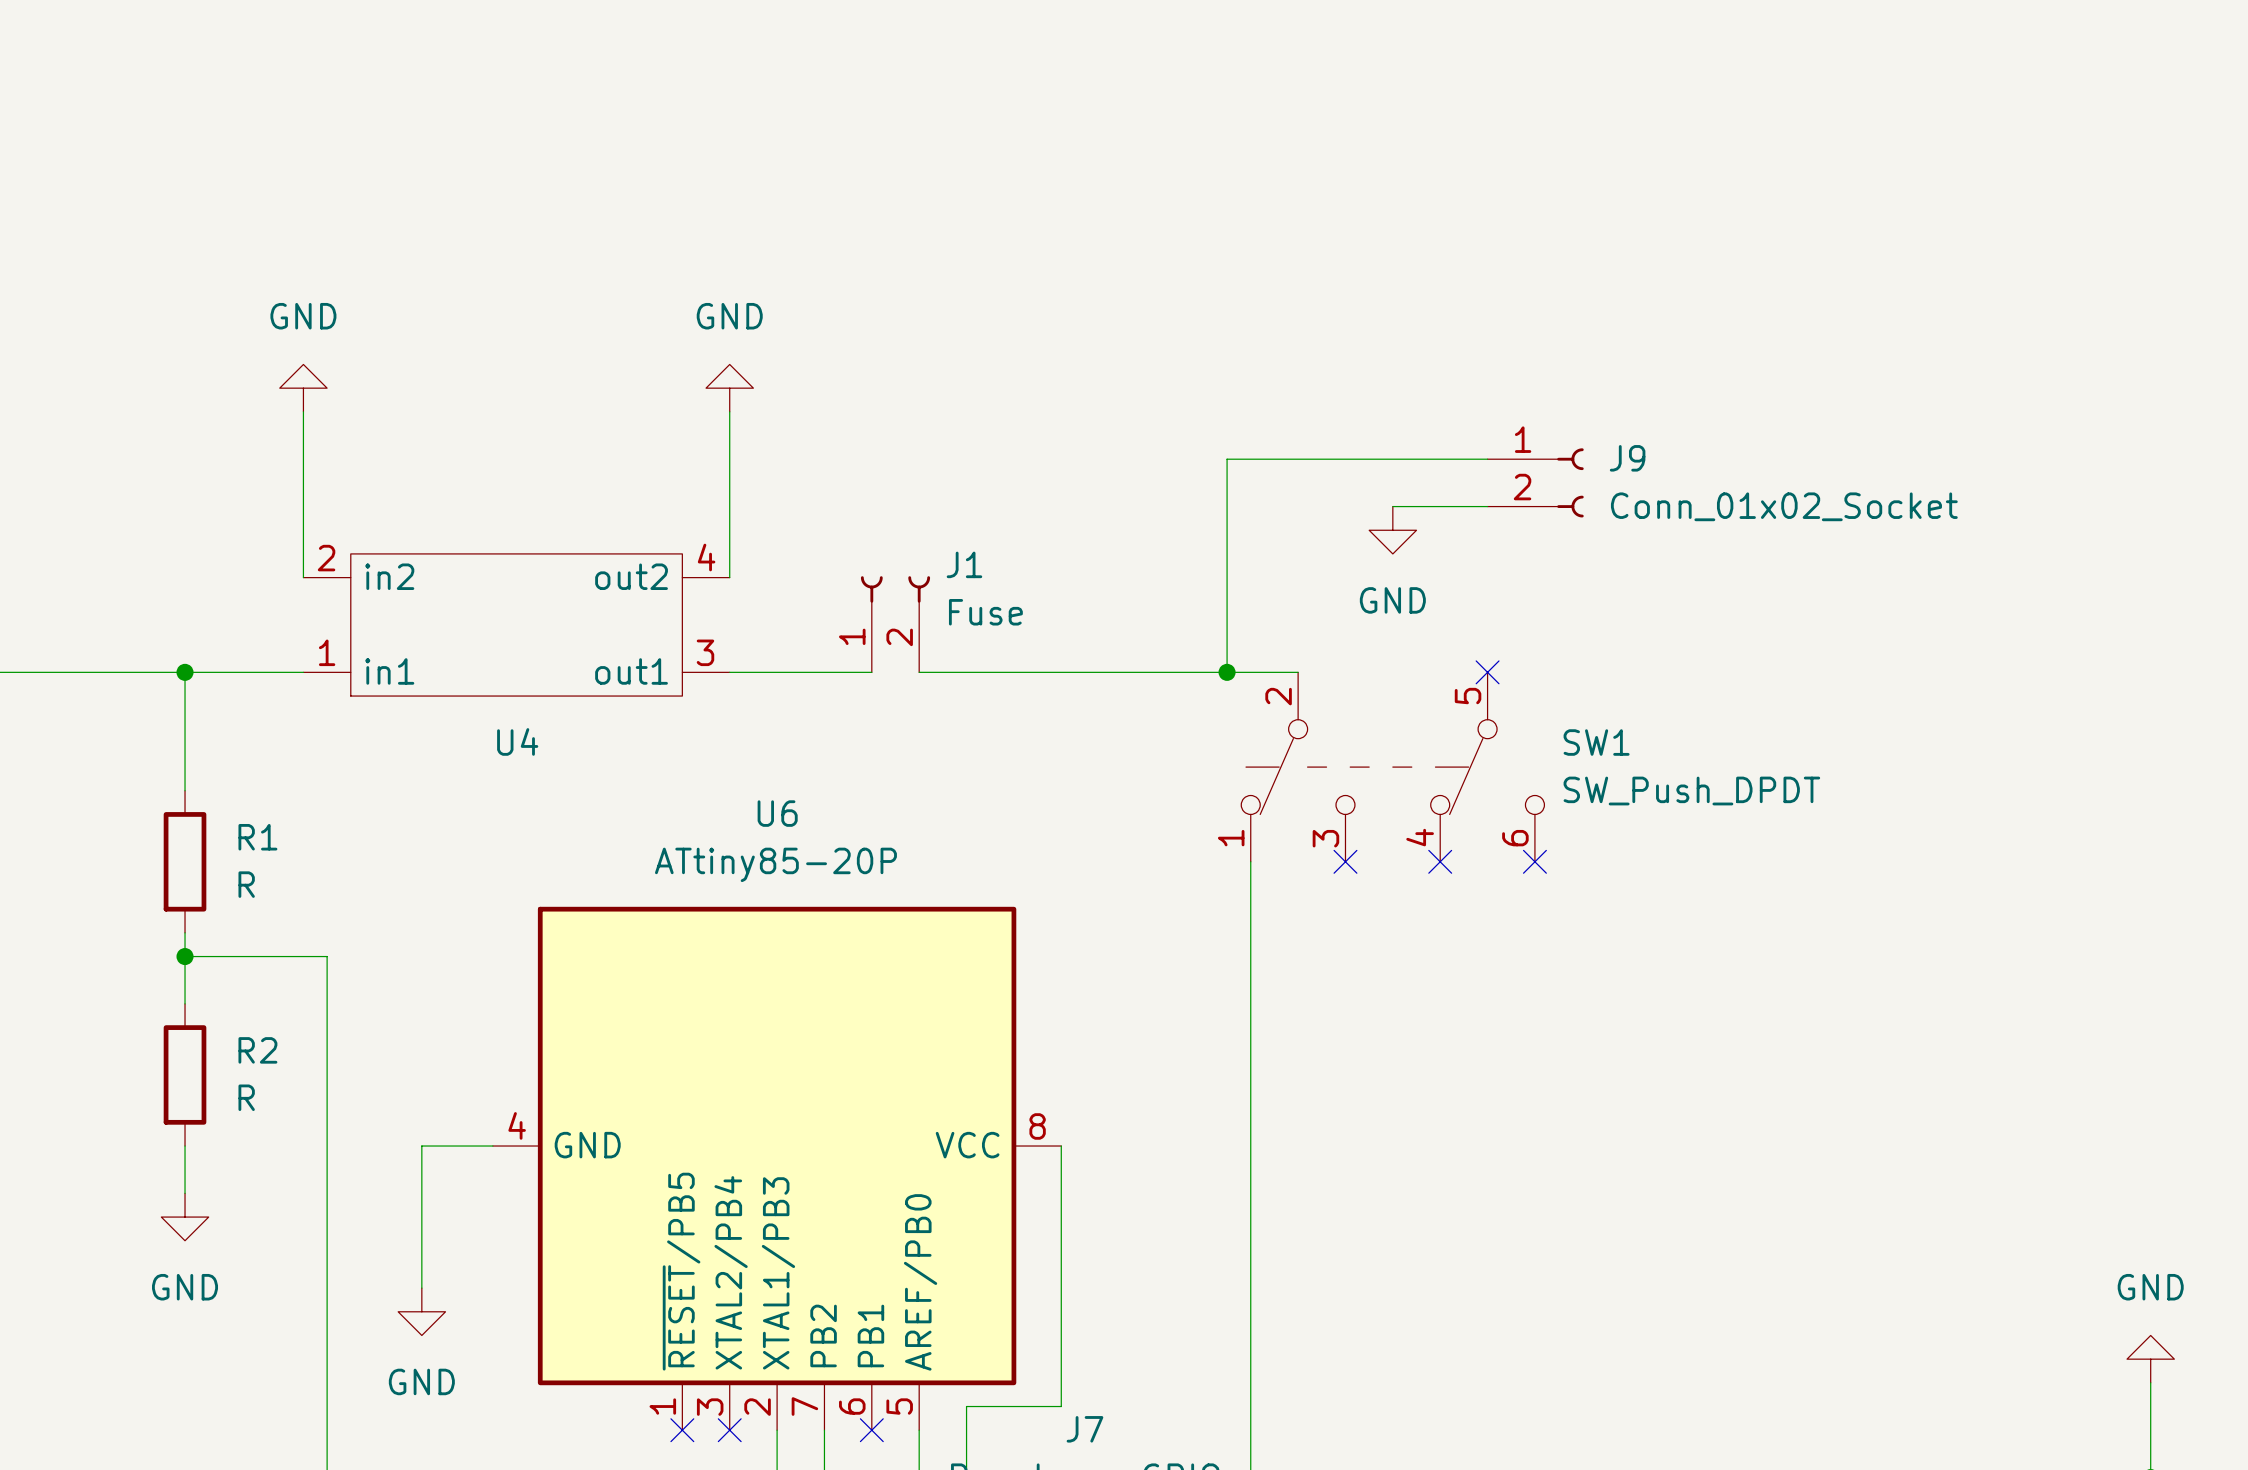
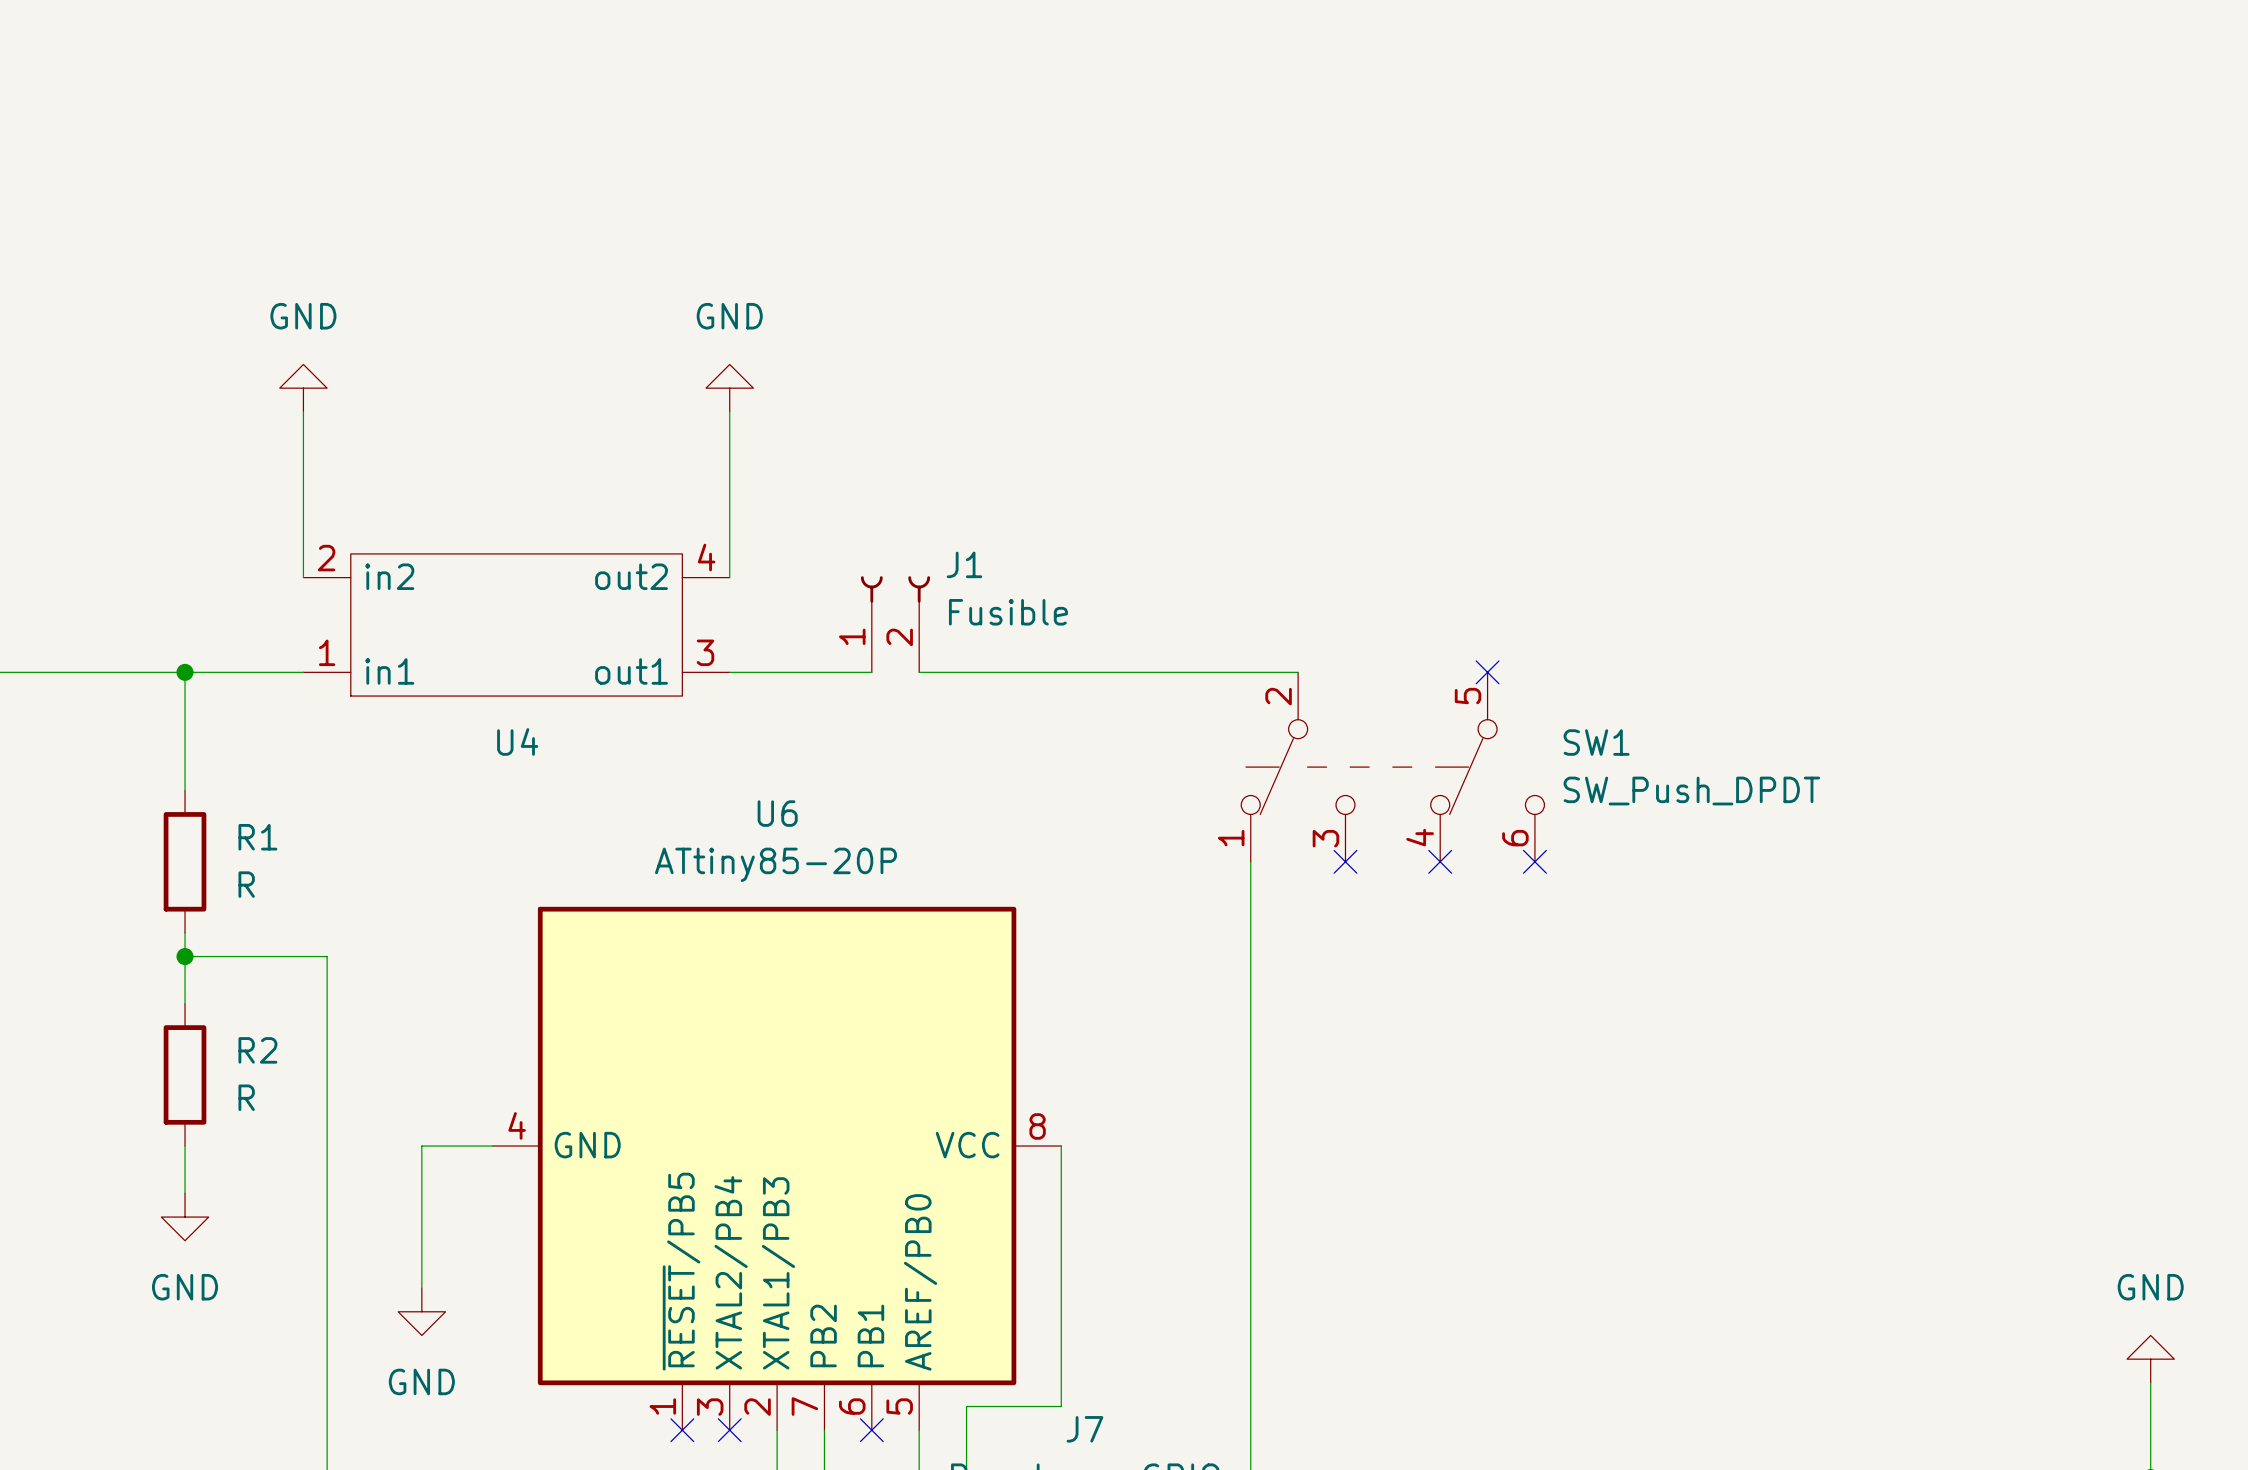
wire: (1487, 459) (1227, 459) (1227, 672) -> none
J9: Conn_01x02_Socket (1535, 482) -> none
wire: (1392, 506) (1487, 506) -> none
power symbol: GND (1392, 530) -> none
J1 value: Fuse (985, 612) -> Fusible (1008, 612)
junction: (1227, 672) -> none

